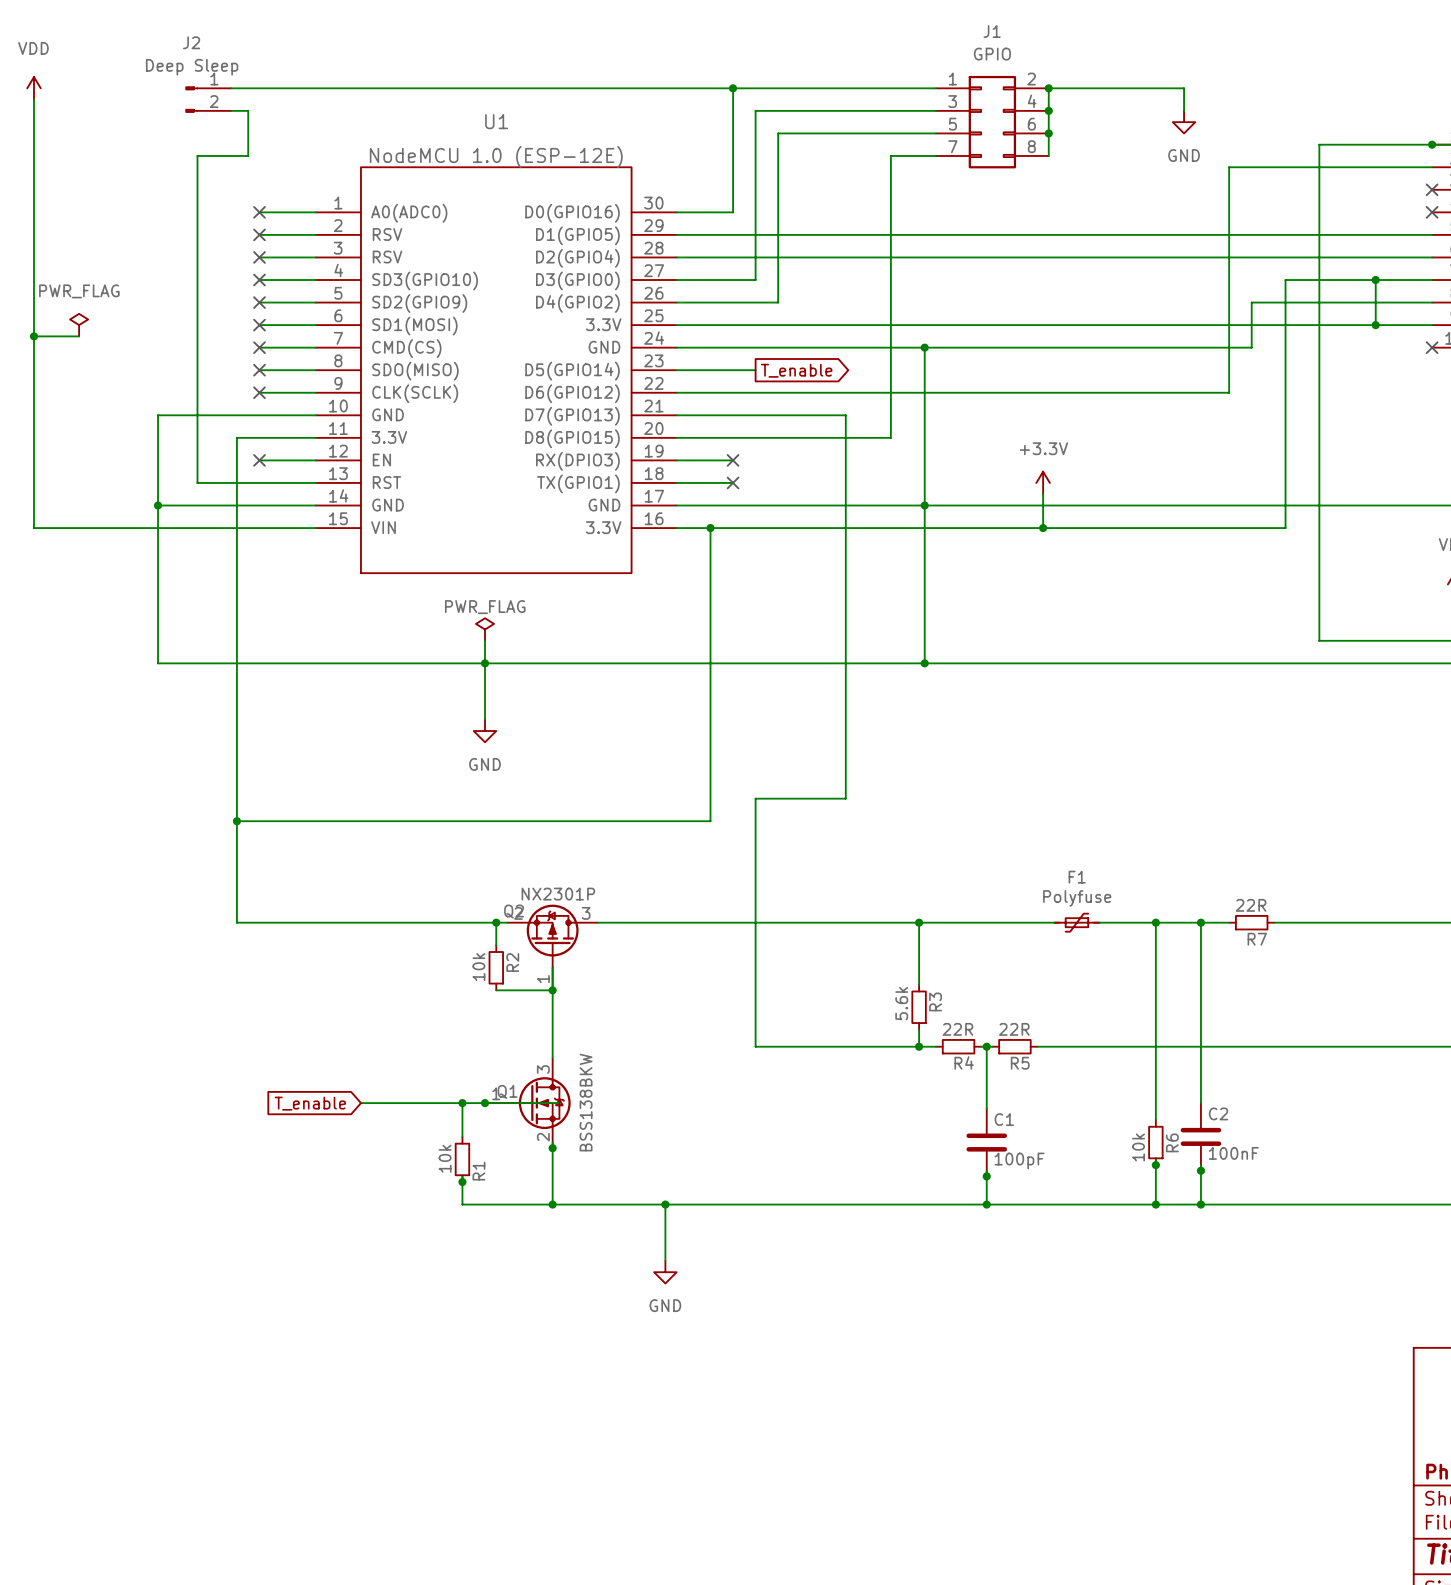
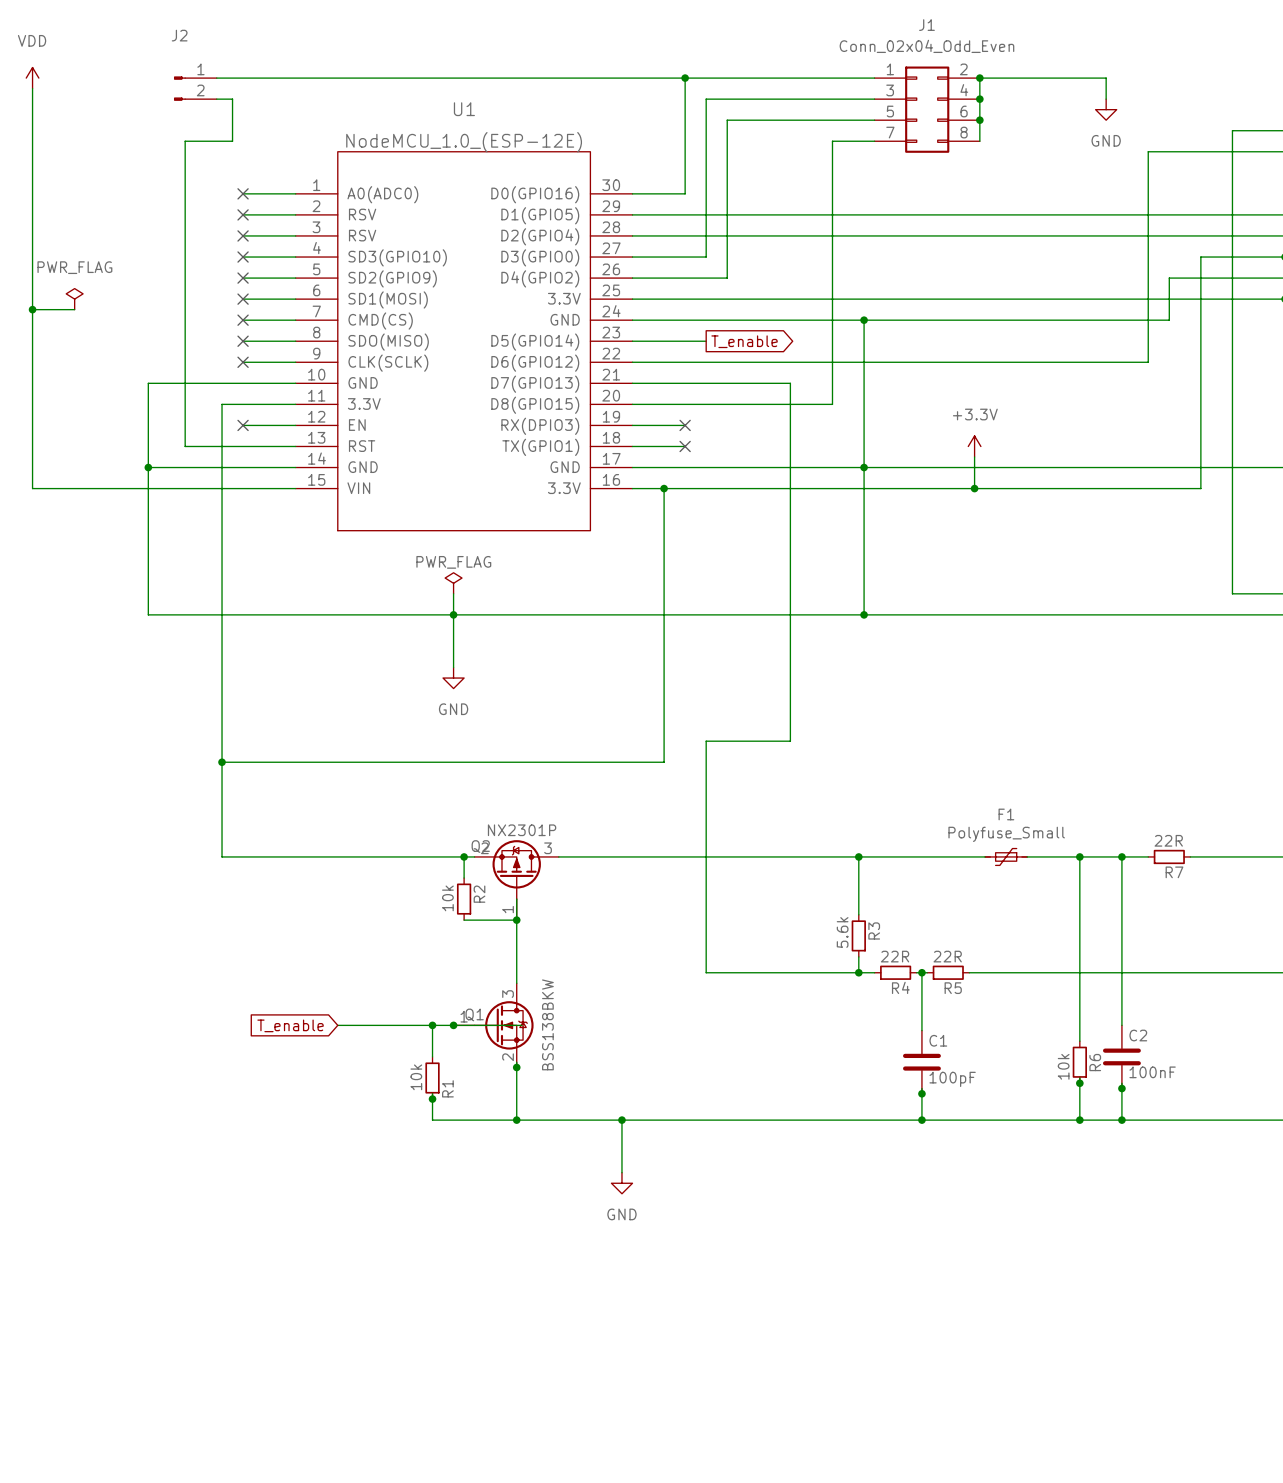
J1 value: GPIO (992, 54) -> Conn_02x04_Odd_Even (926, 46)
J2 value: Deep Sleep (192, 67) -> none
U1 value: NodeMCU 1.0 (ESP-12E) (496, 157) -> NodeMCU_1.0_(ESP-12E) (464, 142)
F1 value: Polyfuse (1077, 898) -> Polyfuse_Small (1006, 834)

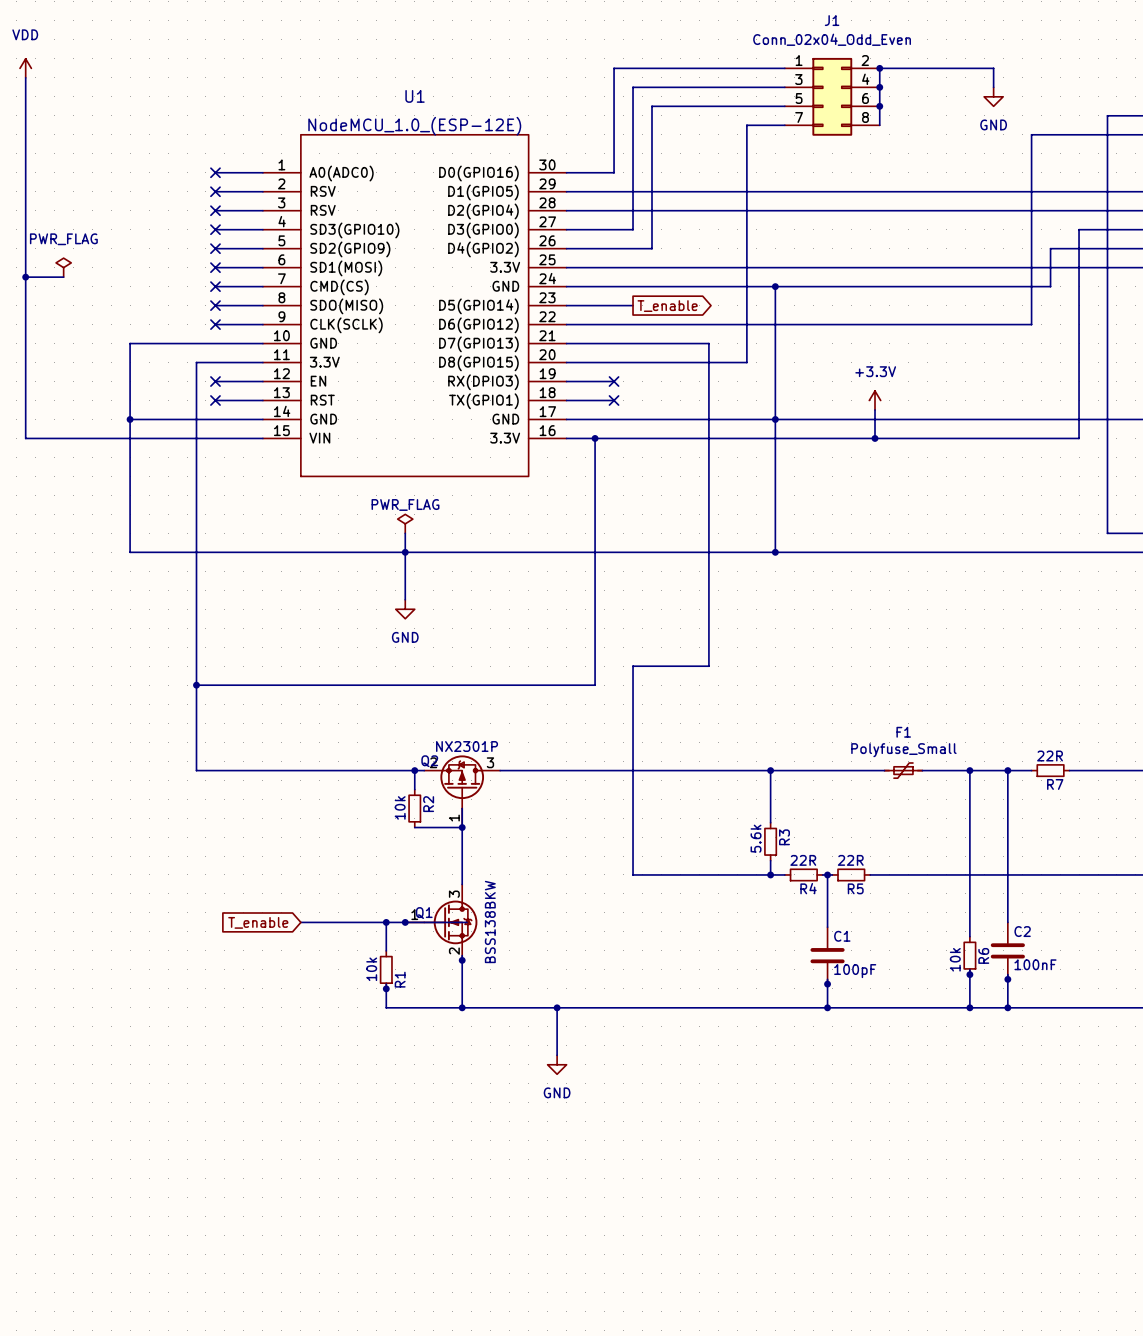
wire: (216, 78) (685, 78) -> none
junction: (685, 78) -> none
J2: (195, 88) -> none
wire: (216, 99) (232, 99) (232, 141) (185, 141) (185, 446) (243, 446) -> none
no-connect mark: none -> (215, 400)

